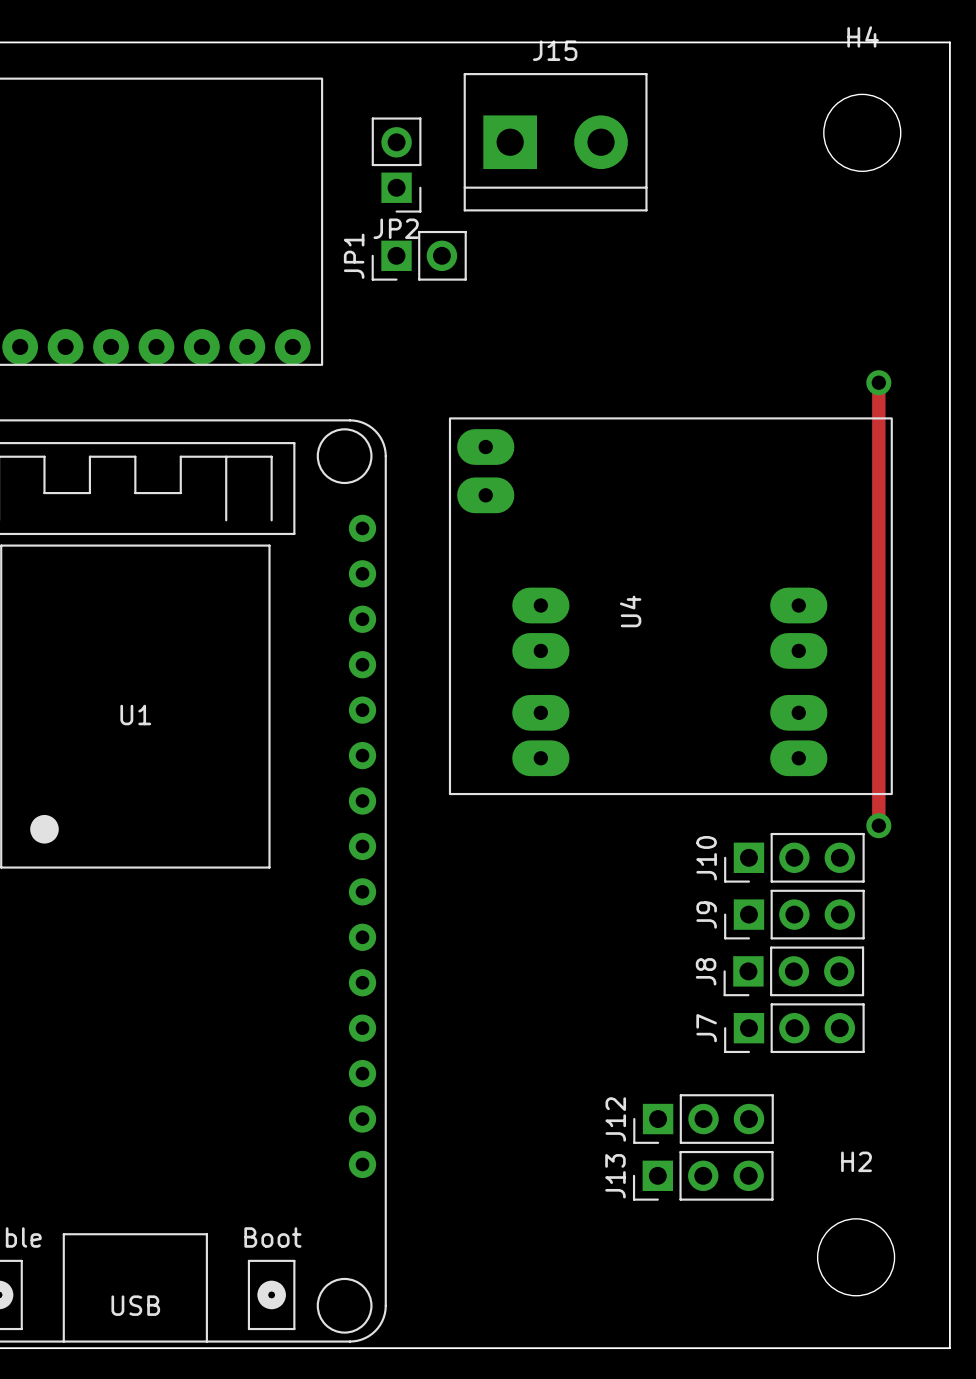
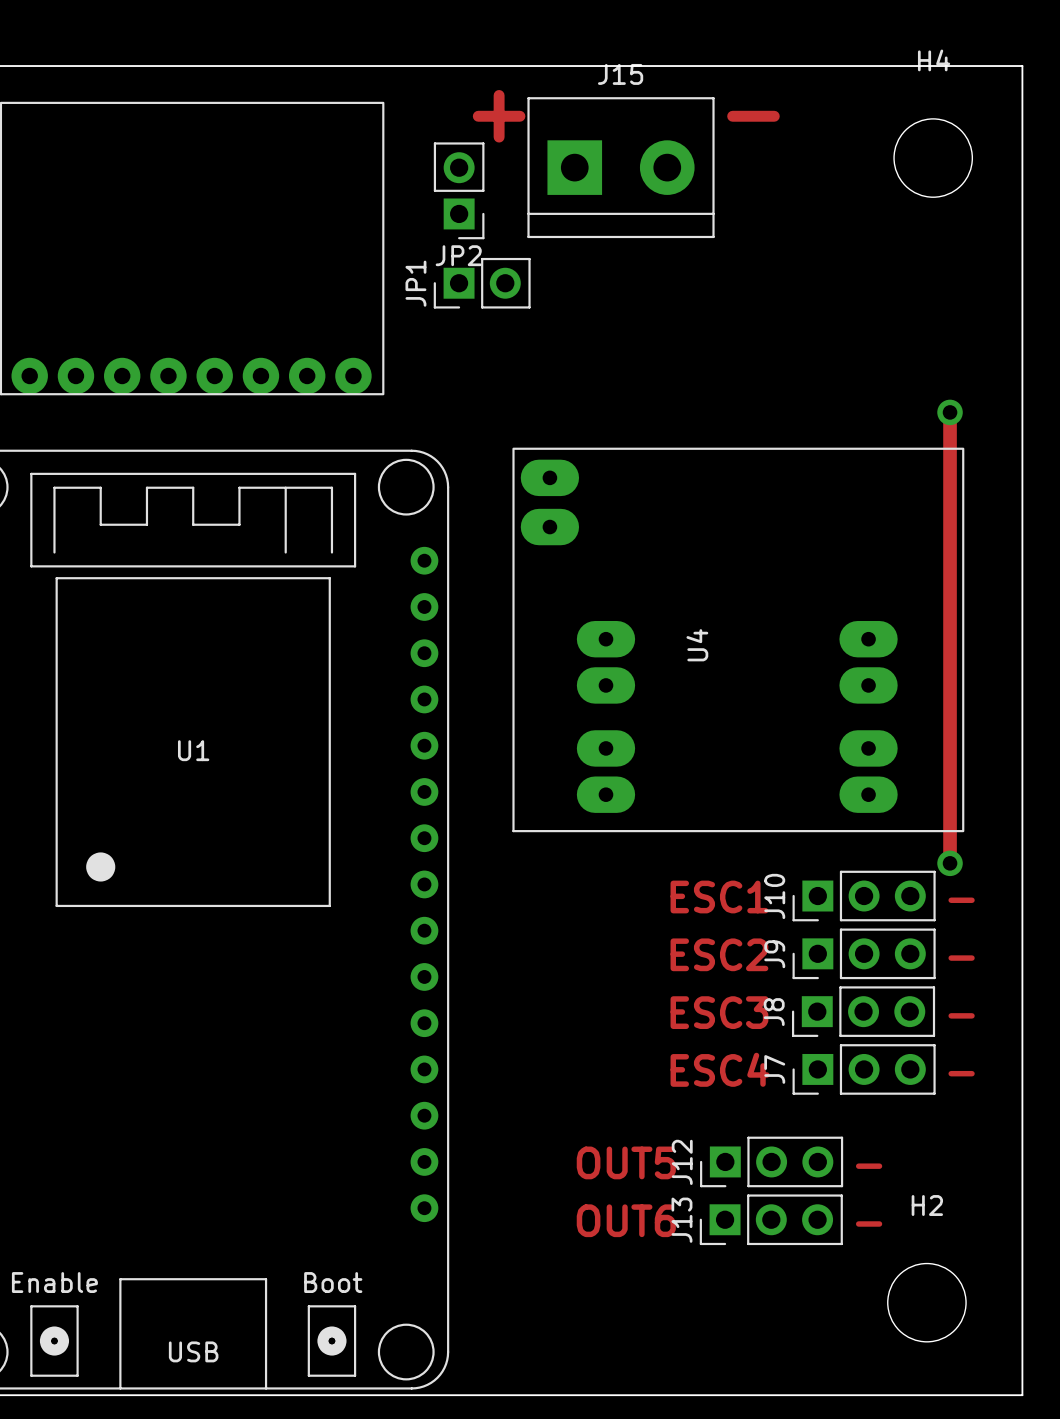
text: none -> + (499, 116)
text: none -> - (753, 116)
text: none -> ESC1 (719, 897)
text: none -> - (961, 900)
text: none -> ESC2 (719, 954)
text: none -> - (961, 958)
text: none -> ESC3 (719, 1012)
text: none -> - (961, 1015)
text: none -> ESC4 (720, 1069)
text: none -> - (961, 1073)
text: none -> OUT5 (626, 1162)
text: none -> - (869, 1166)
text: none -> OUT6 (626, 1220)
text: none -> - (869, 1223)

